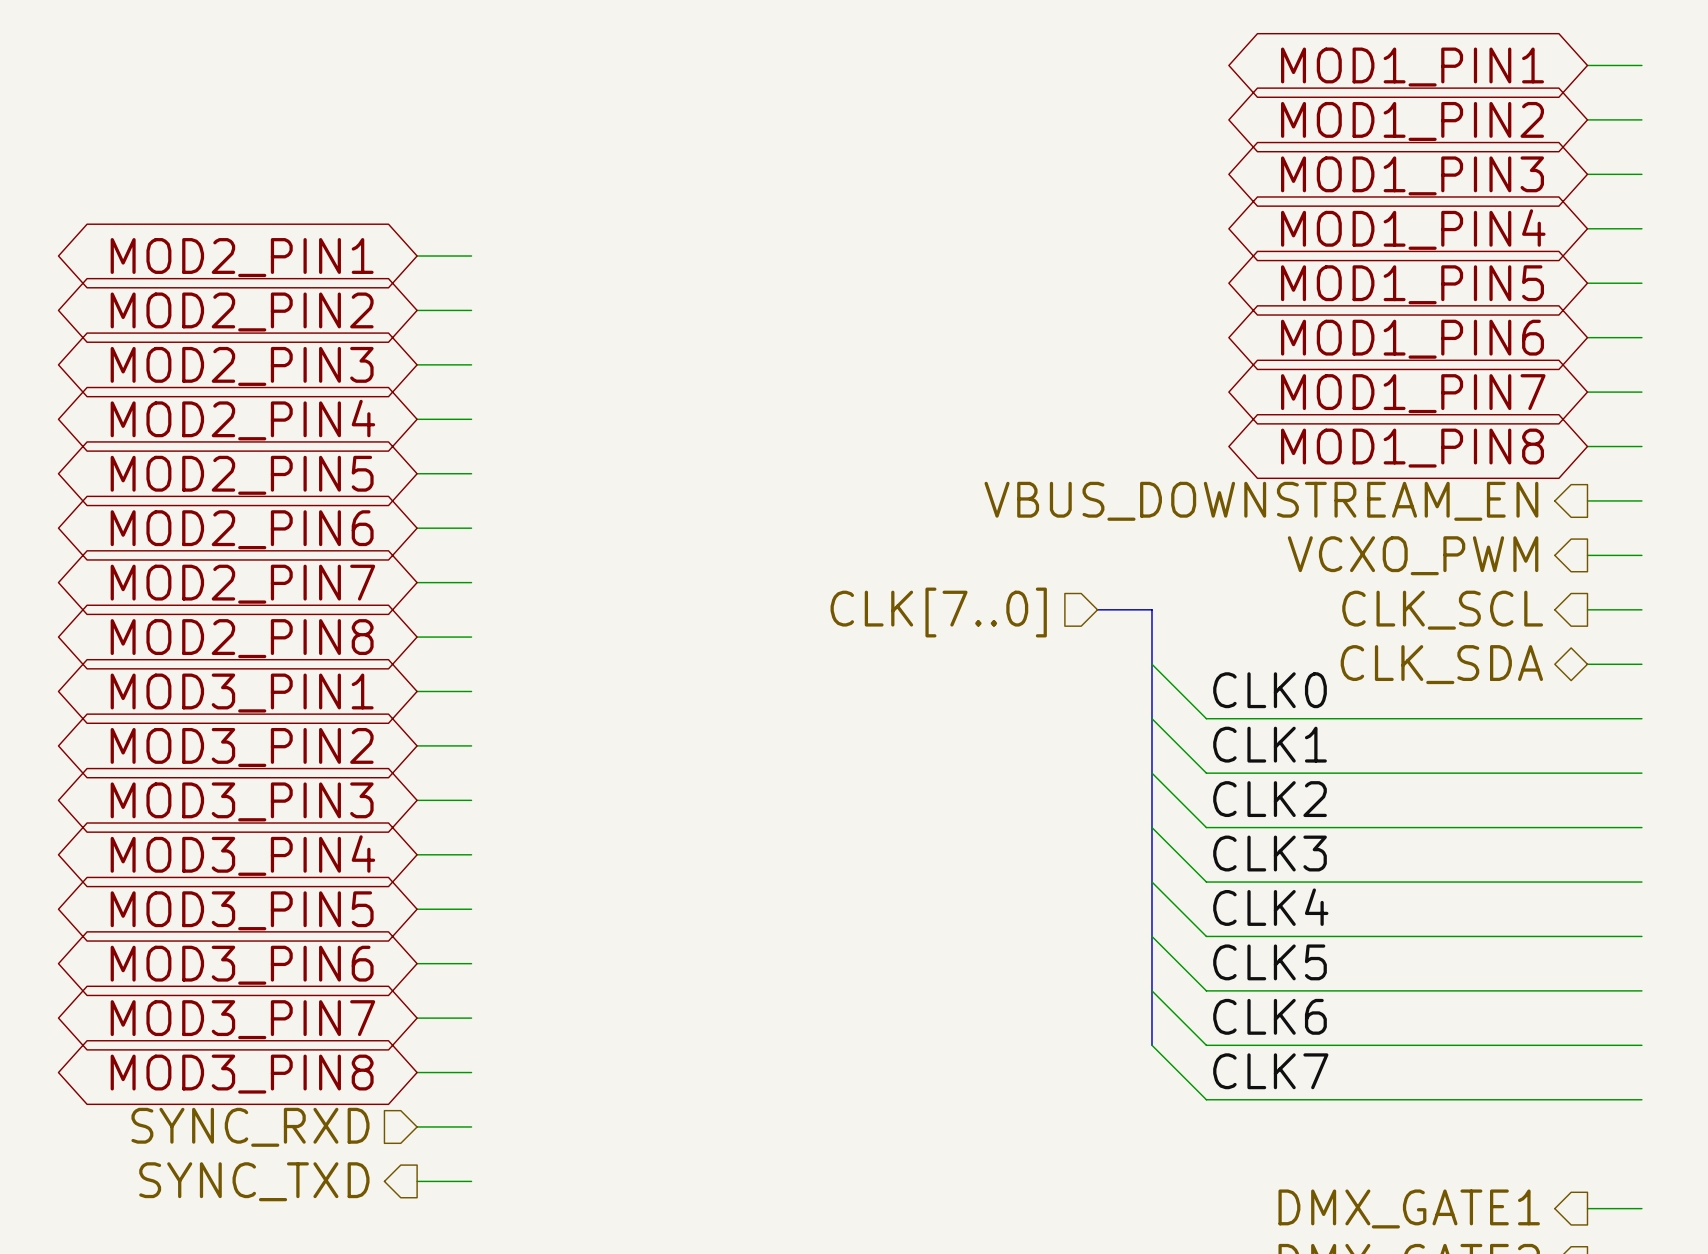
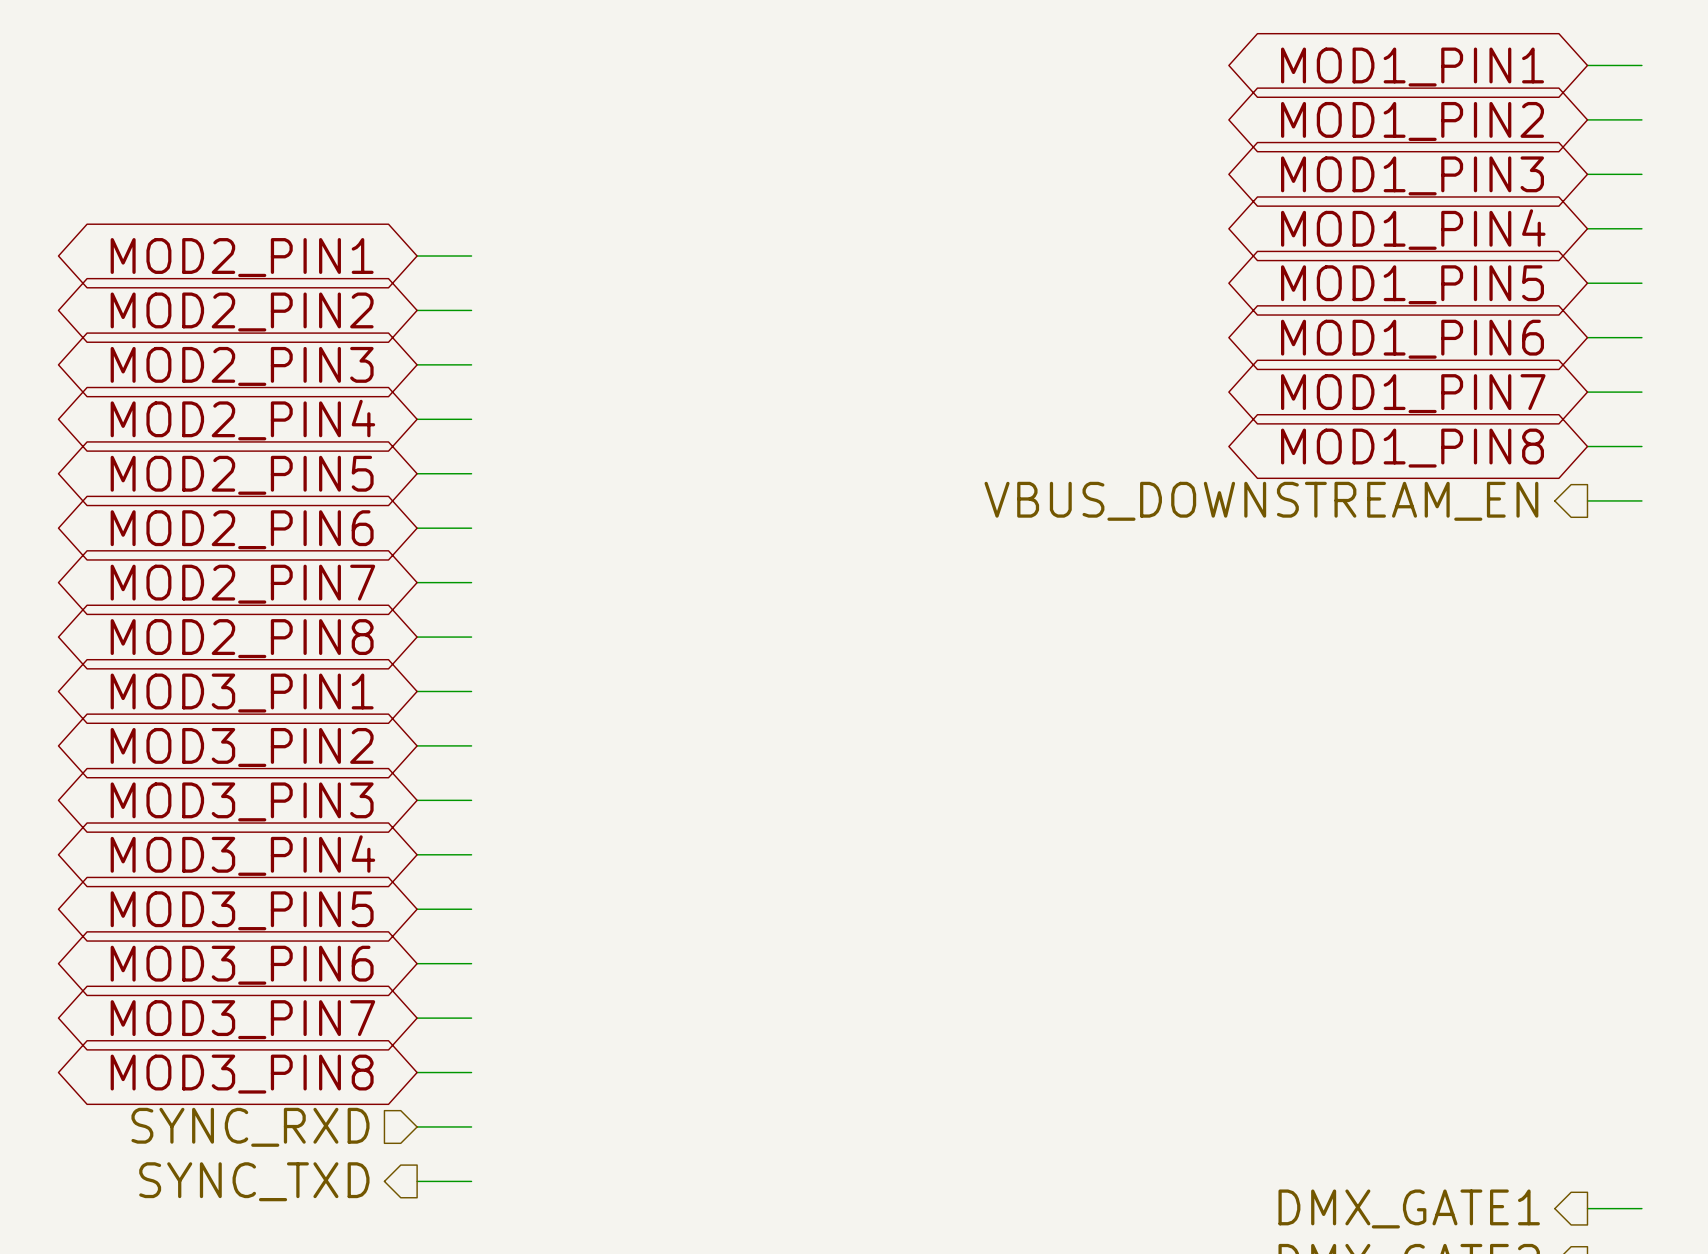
hierarchical label: VCXO_PWM (1413, 555) -> none
wire: (1587, 555) (1641, 555) -> none
bus: (1097, 609) (1151, 609) (1151, 1045) -> none
wire: (1587, 609) (1641, 609) -> none
hierarchical label: CLK_SCL (1442, 610) -> none
hierarchical label: CLK[7..0] (938, 612) -> none
wire: (1151, 664) (1206, 718) (1641, 718) -> none
hierarchical label: CLK_SDA (1441, 664) -> none
wire: (1587, 664) (1641, 664) -> none
label: CLK0 (1270, 690) -> none
wire: (1151, 718) (1206, 773) (1641, 773) -> none
label: CLK1 (1270, 744) -> none
wire: (1151, 773) (1206, 827) (1641, 827) -> none
label: CLK2 (1270, 799) -> none
wire: (1151, 827) (1206, 882) (1641, 882) -> none
label: CLK3 (1270, 853) -> none
wire: (1151, 882) (1206, 936) (1641, 936) -> none
label: CLK4 (1270, 907) -> none
wire: (1151, 936) (1206, 990) (1641, 990) -> none
label: CLK5 (1270, 962) -> none
wire: (1151, 990) (1206, 1045) (1641, 1045) -> none
label: CLK6 (1270, 1016) -> none
wire: (1151, 1045) (1206, 1099) (1641, 1099) -> none
label: CLK7 (1270, 1071) -> none

